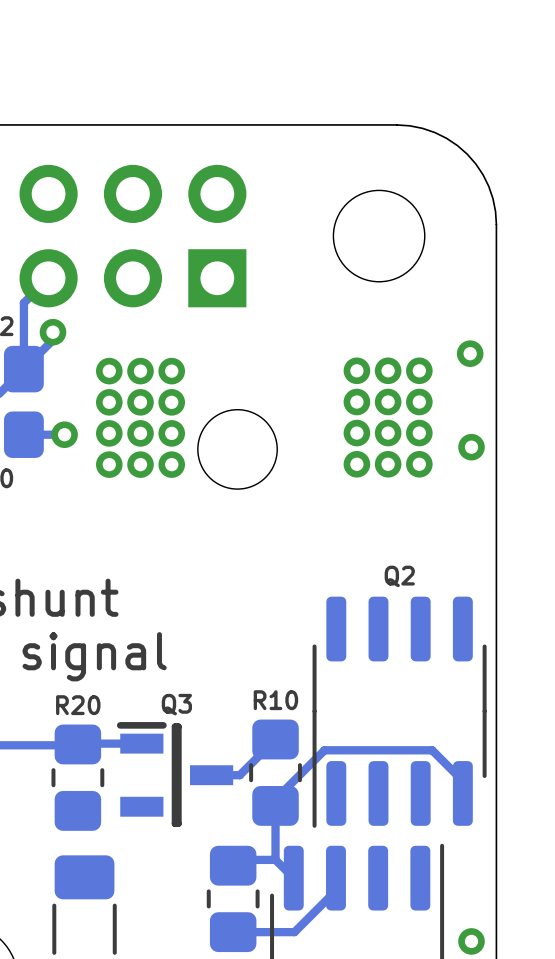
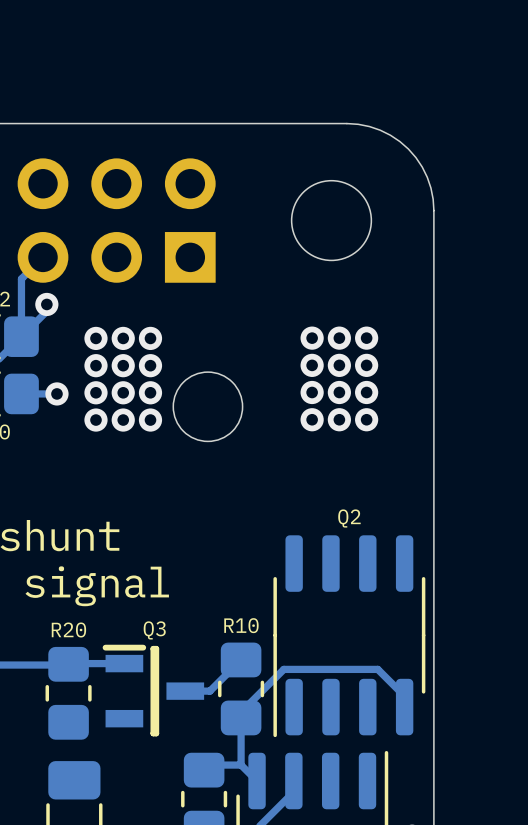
via: (470, 353) -> none
via: (471, 447) -> none

